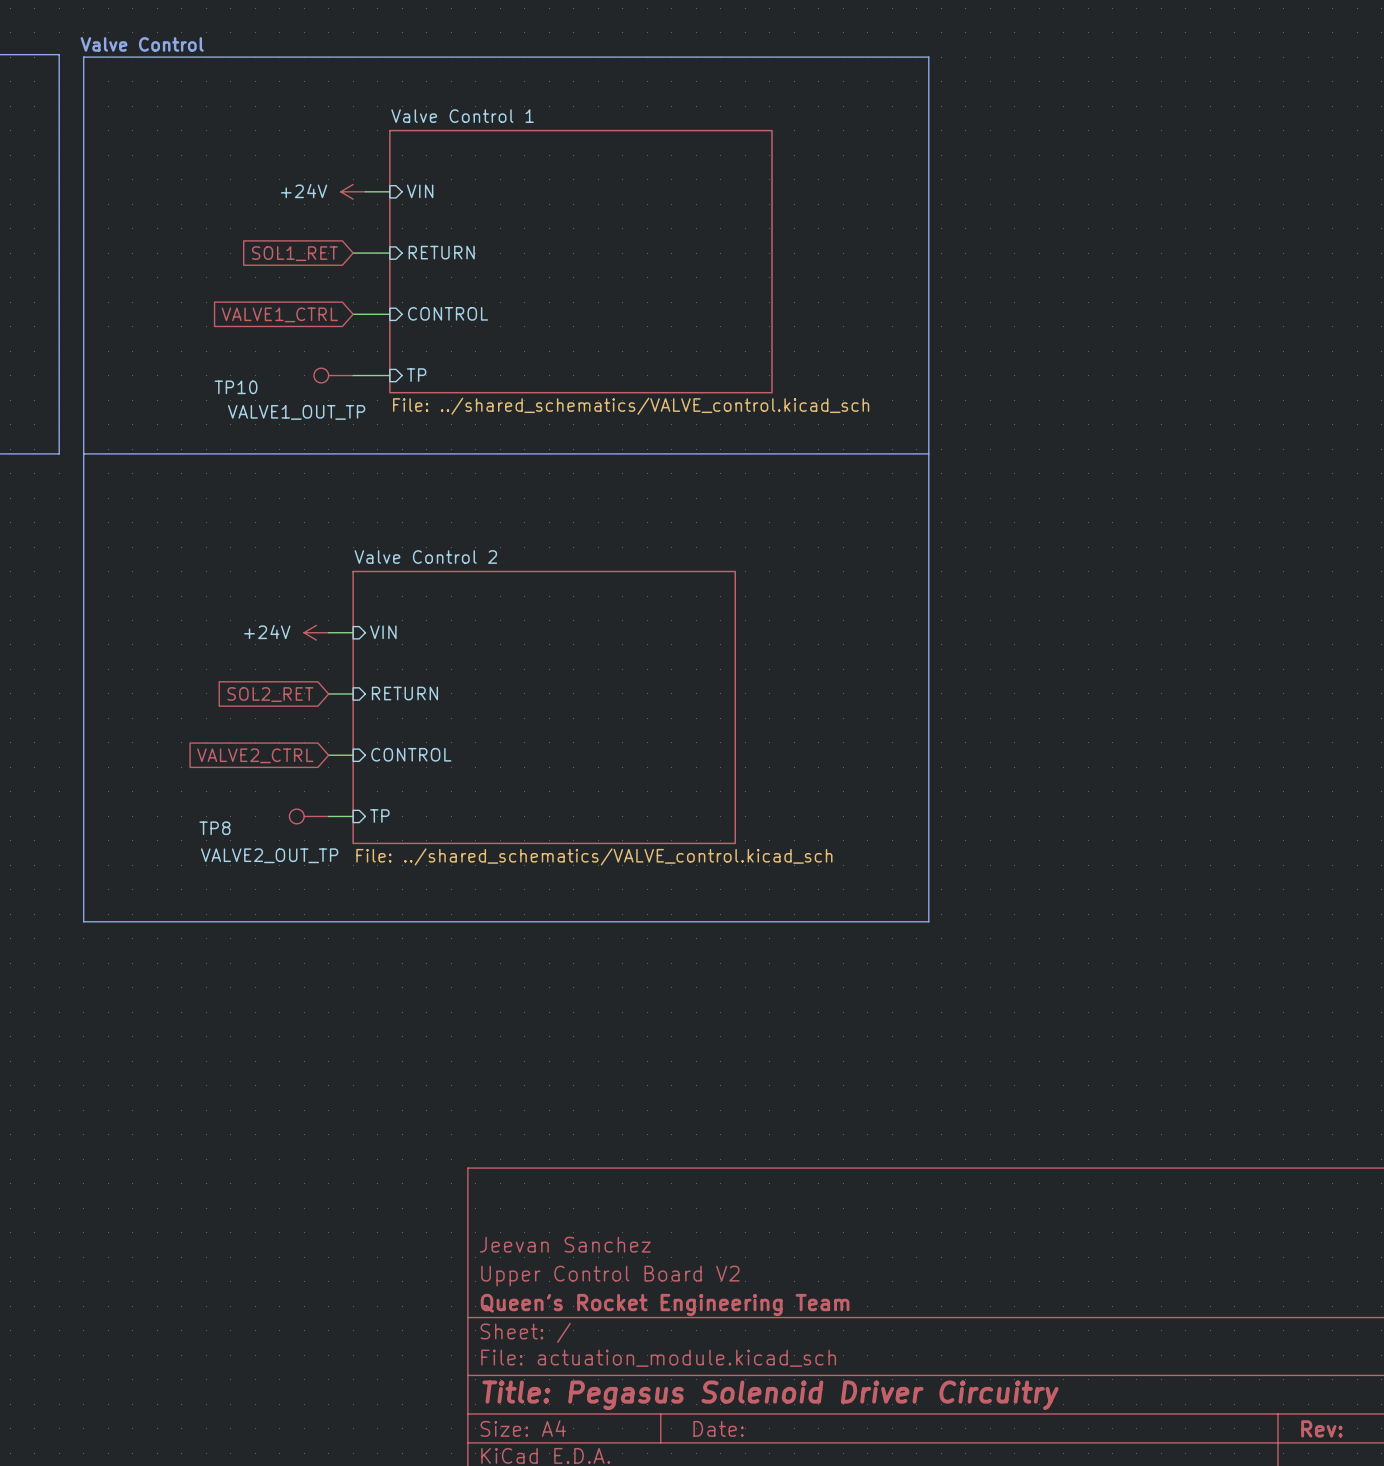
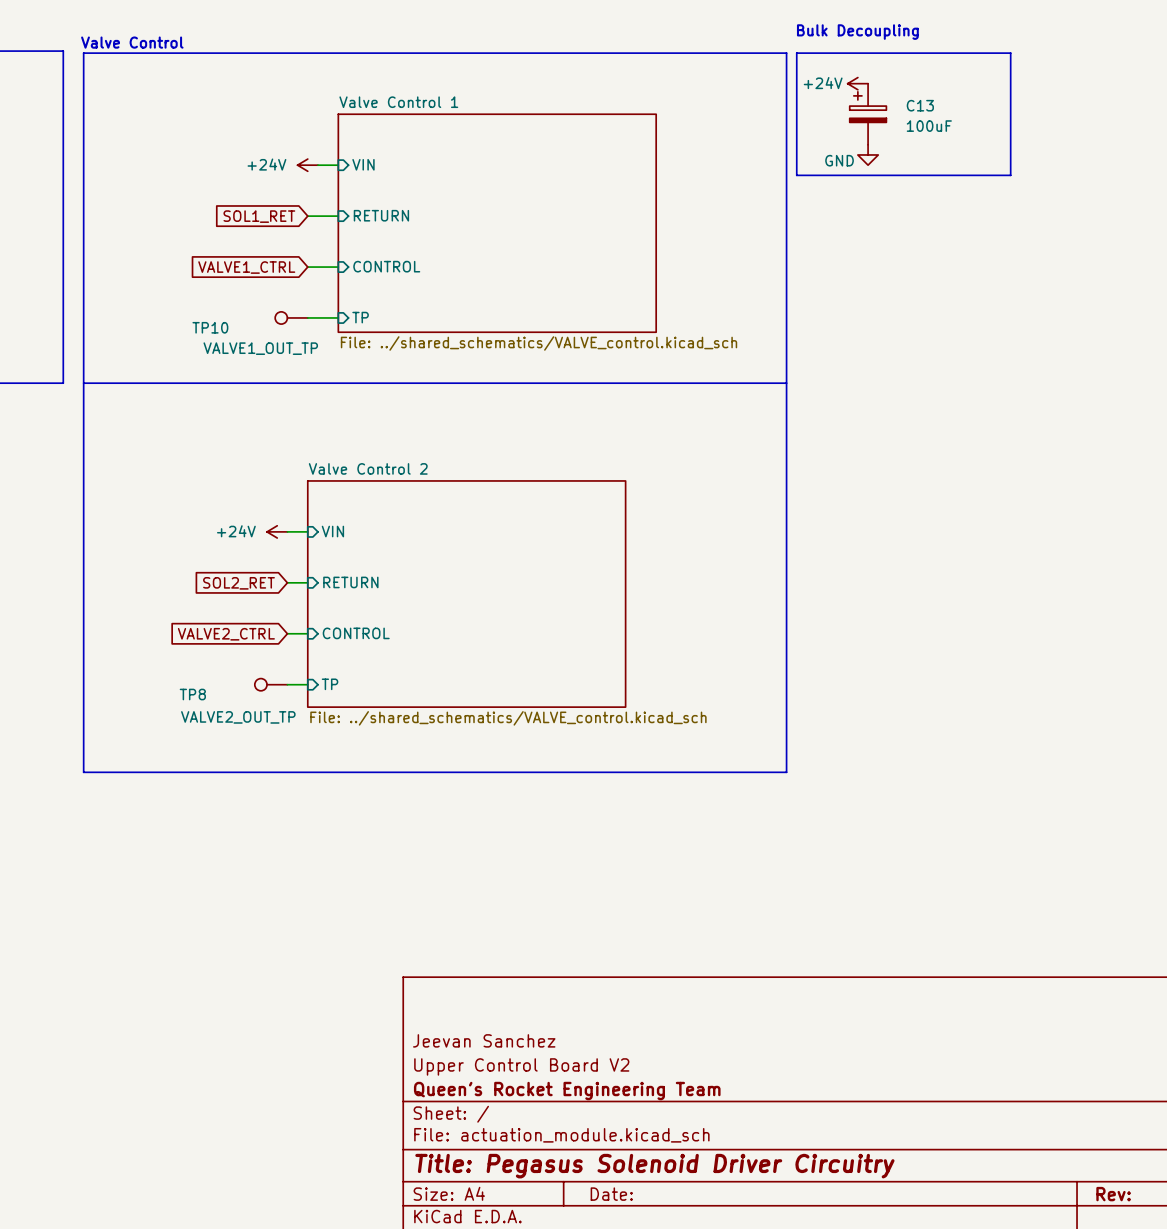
text: none -> Bulk Decoupling (857, 32)
line: none -> (796, 53) (1010, 53) (1010, 175) (796, 175) (796, 53)
power symbol: none -> +24V (857, 83)
C13: none -> 100uF (868, 114)
power symbol: none -> GND (868, 154)

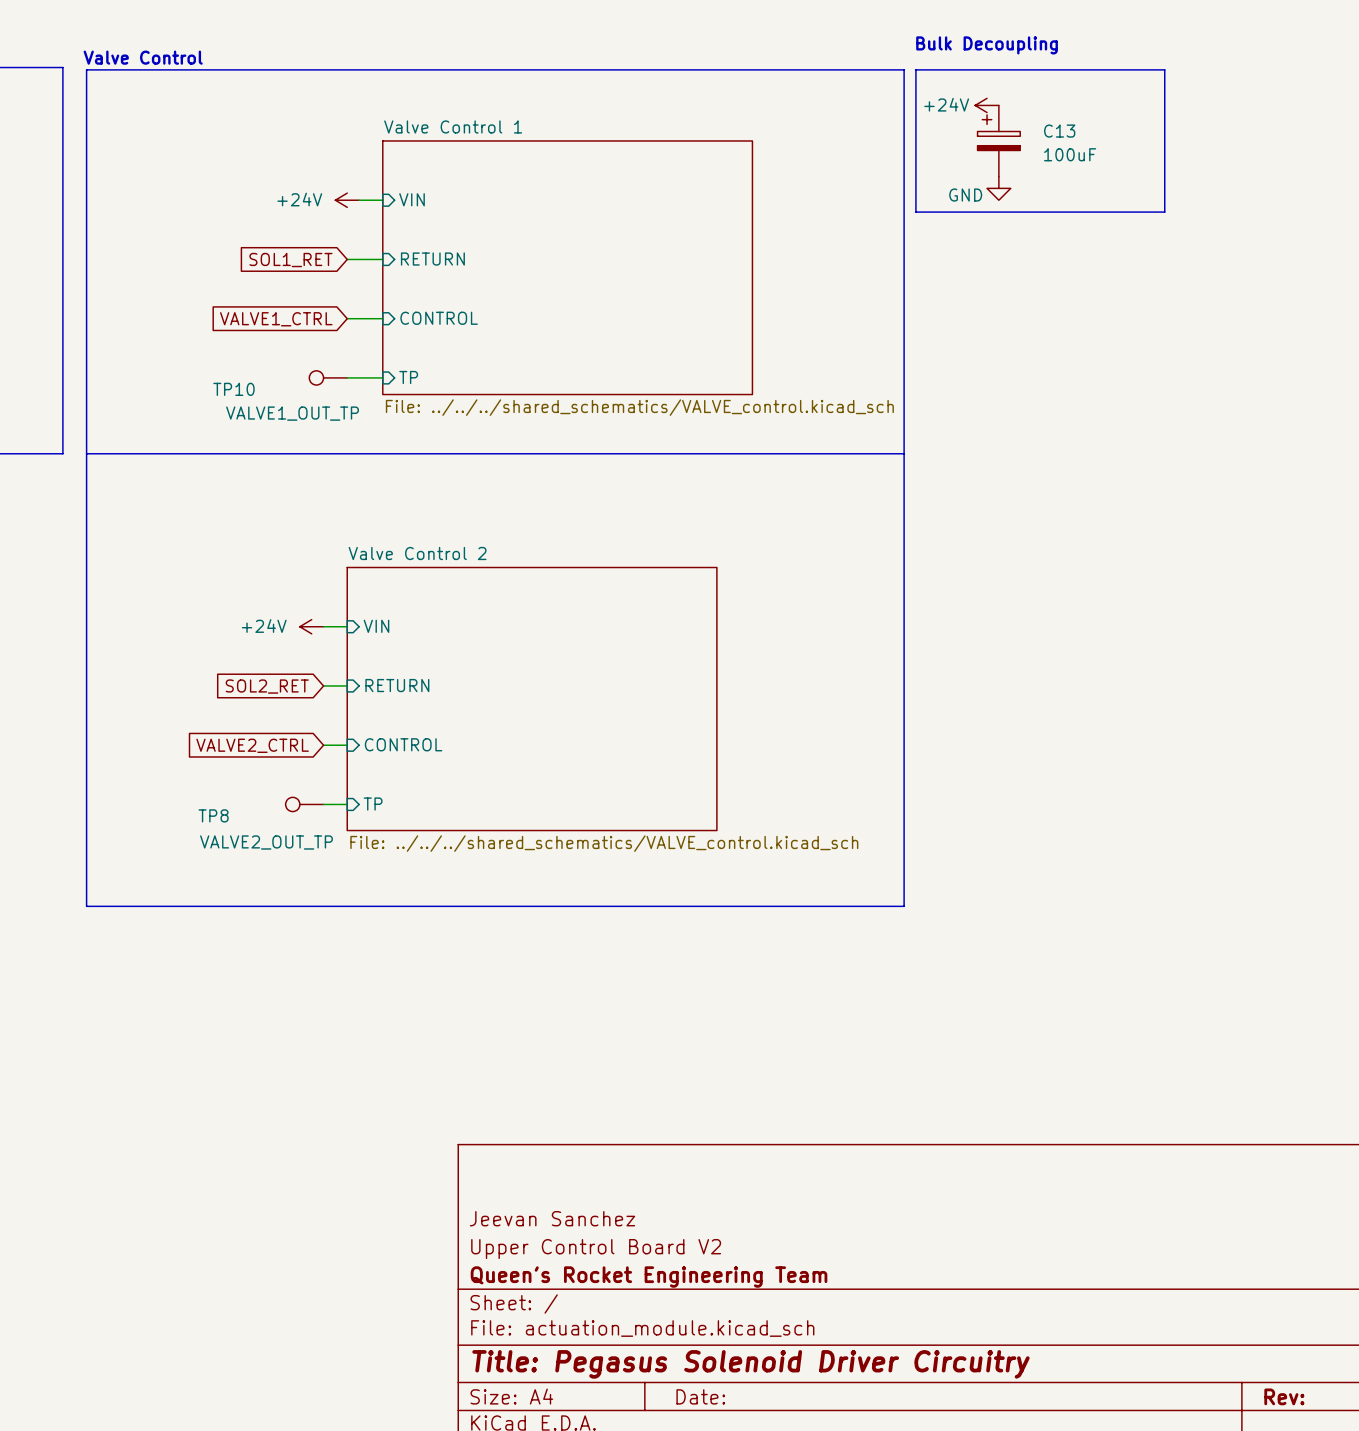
sheet Valve Control 1 value: File: ../shared_schematics/VALVE_control.kicad_sch (539, 343) -> File: ../../../shared_schematics/VALVE_control.kicad_sch (639, 407)
sheet Valve Control 2 value: File: ../shared_schematics/VALVE_control.kicad_sch (508, 718) -> File: ../../../shared_schematics/VALVE_control.kicad_sch (604, 843)

